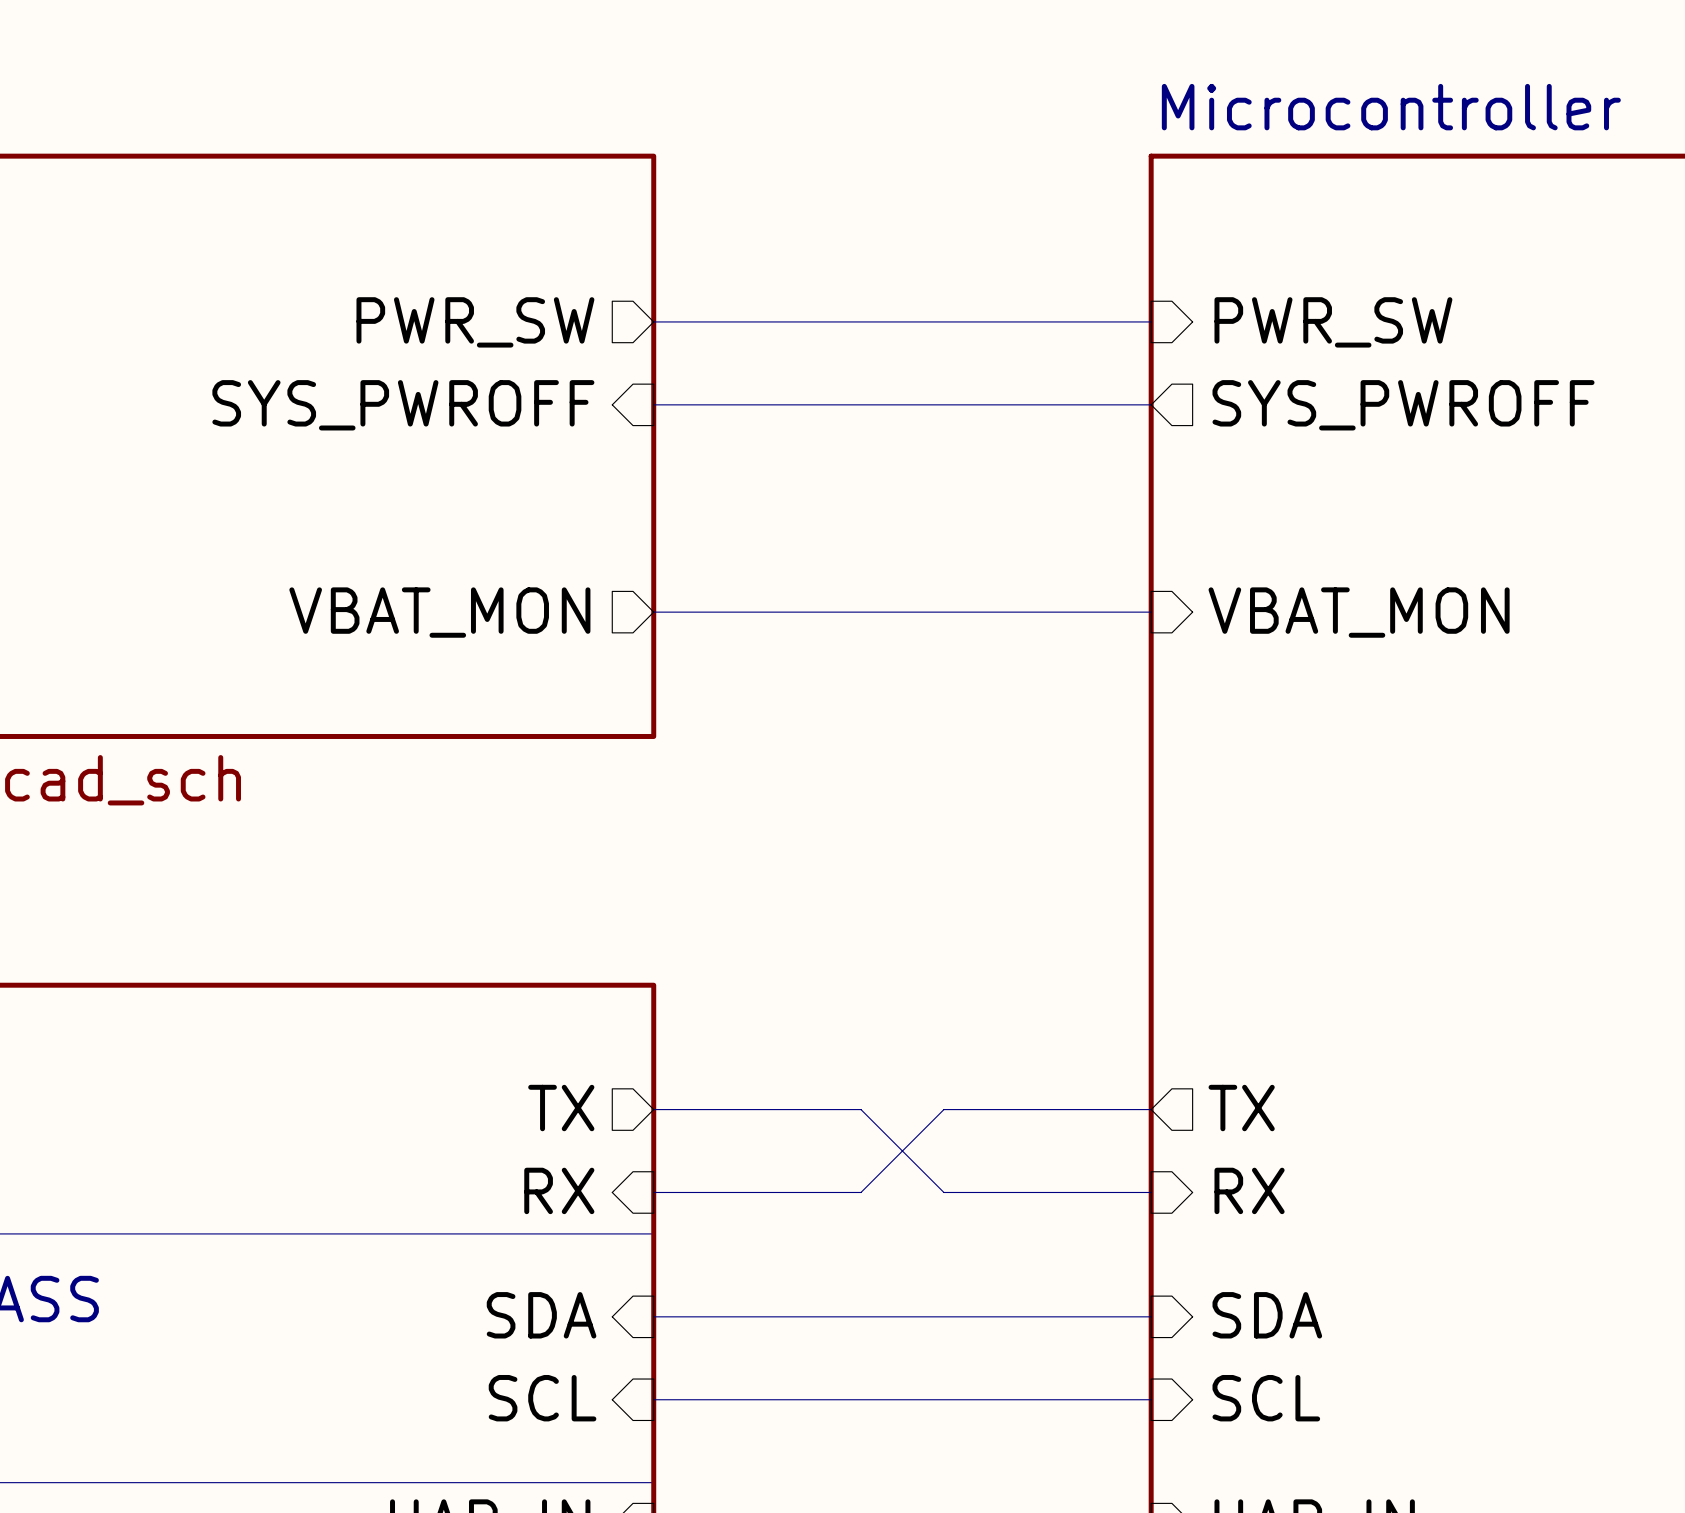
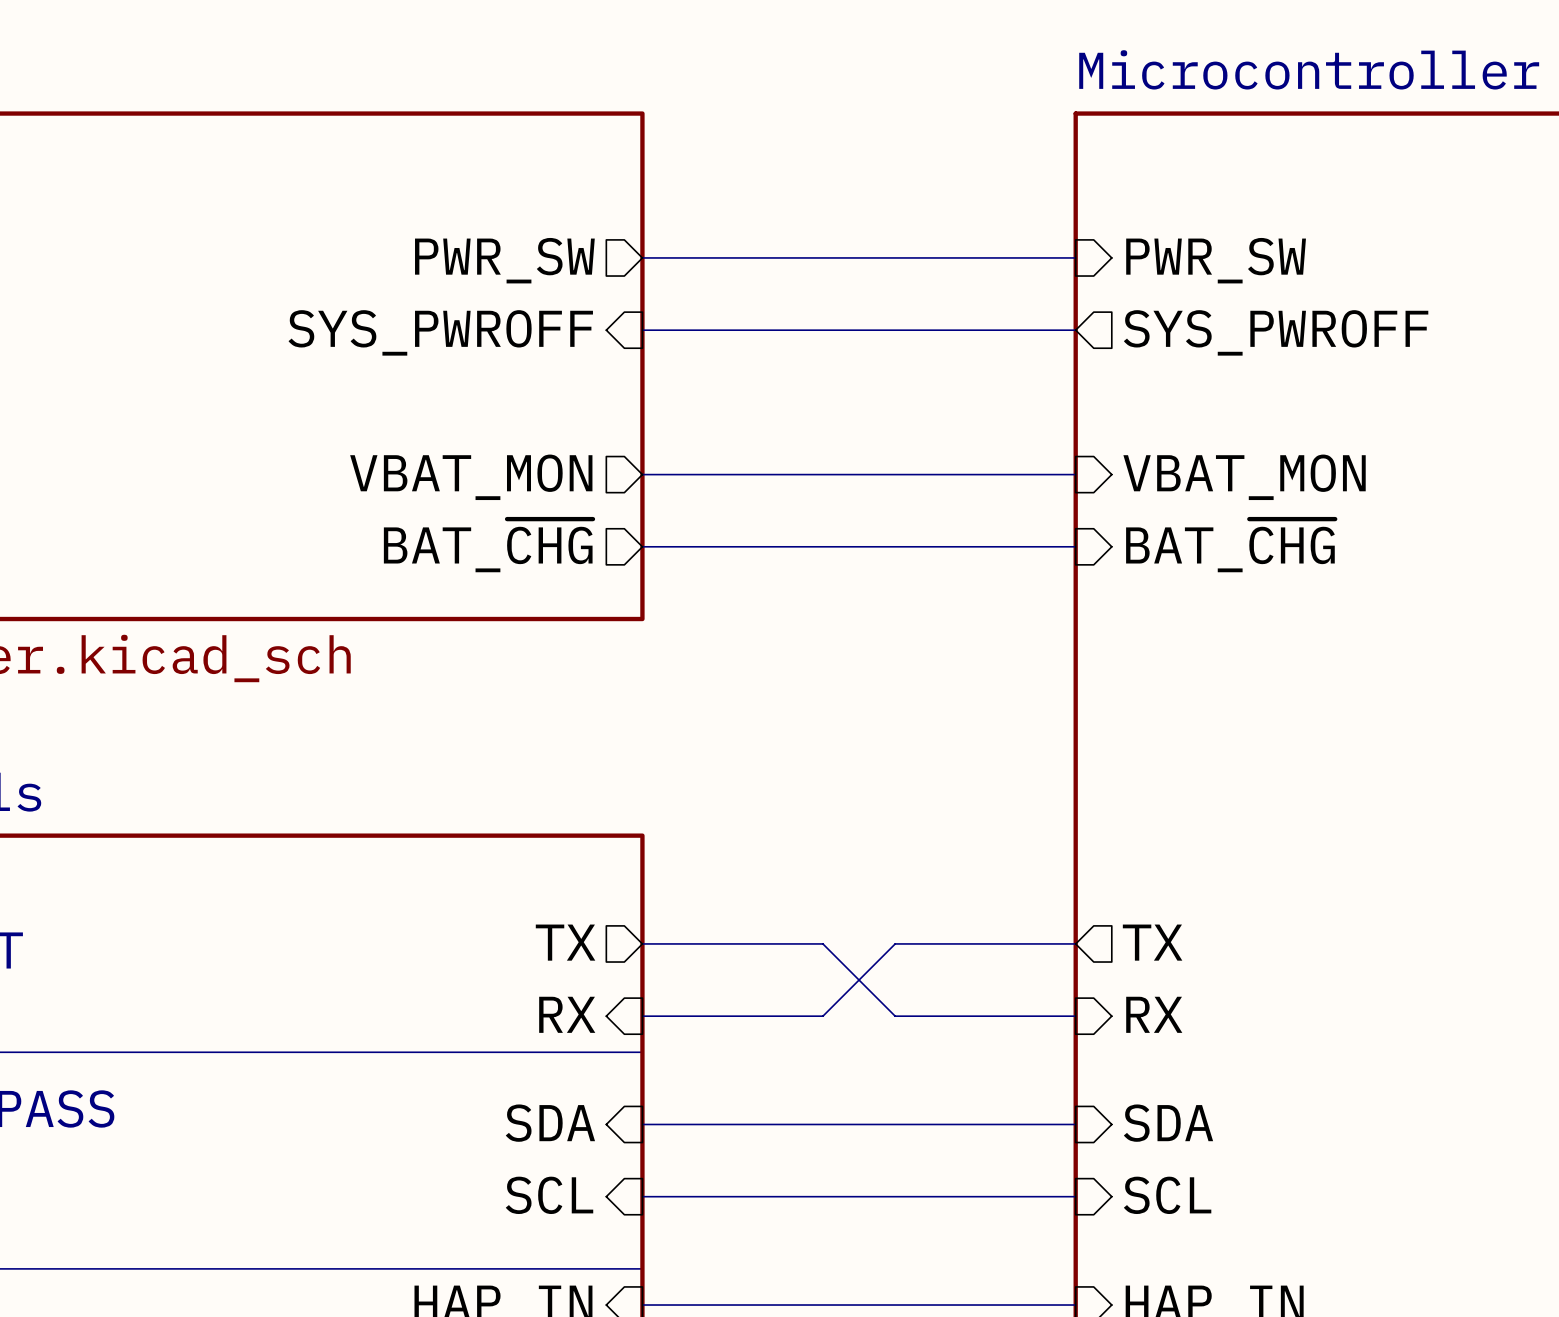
wire: none -> (642, 474) (1075, 474)
sheet pin position: VBAT_MON (439, 612) -> VBAT_MON (471, 477)
wire: (653, 612) (1151, 612) -> (642, 546) (1075, 546)
sheet pin position: VBAT_MON (1359, 612) -> VBAT_MON (1244, 477)
sheet pin: none -> BAT_~{CHG} (488, 545)
sheet pin: none -> BAT_~{CHG} (1230, 545)

